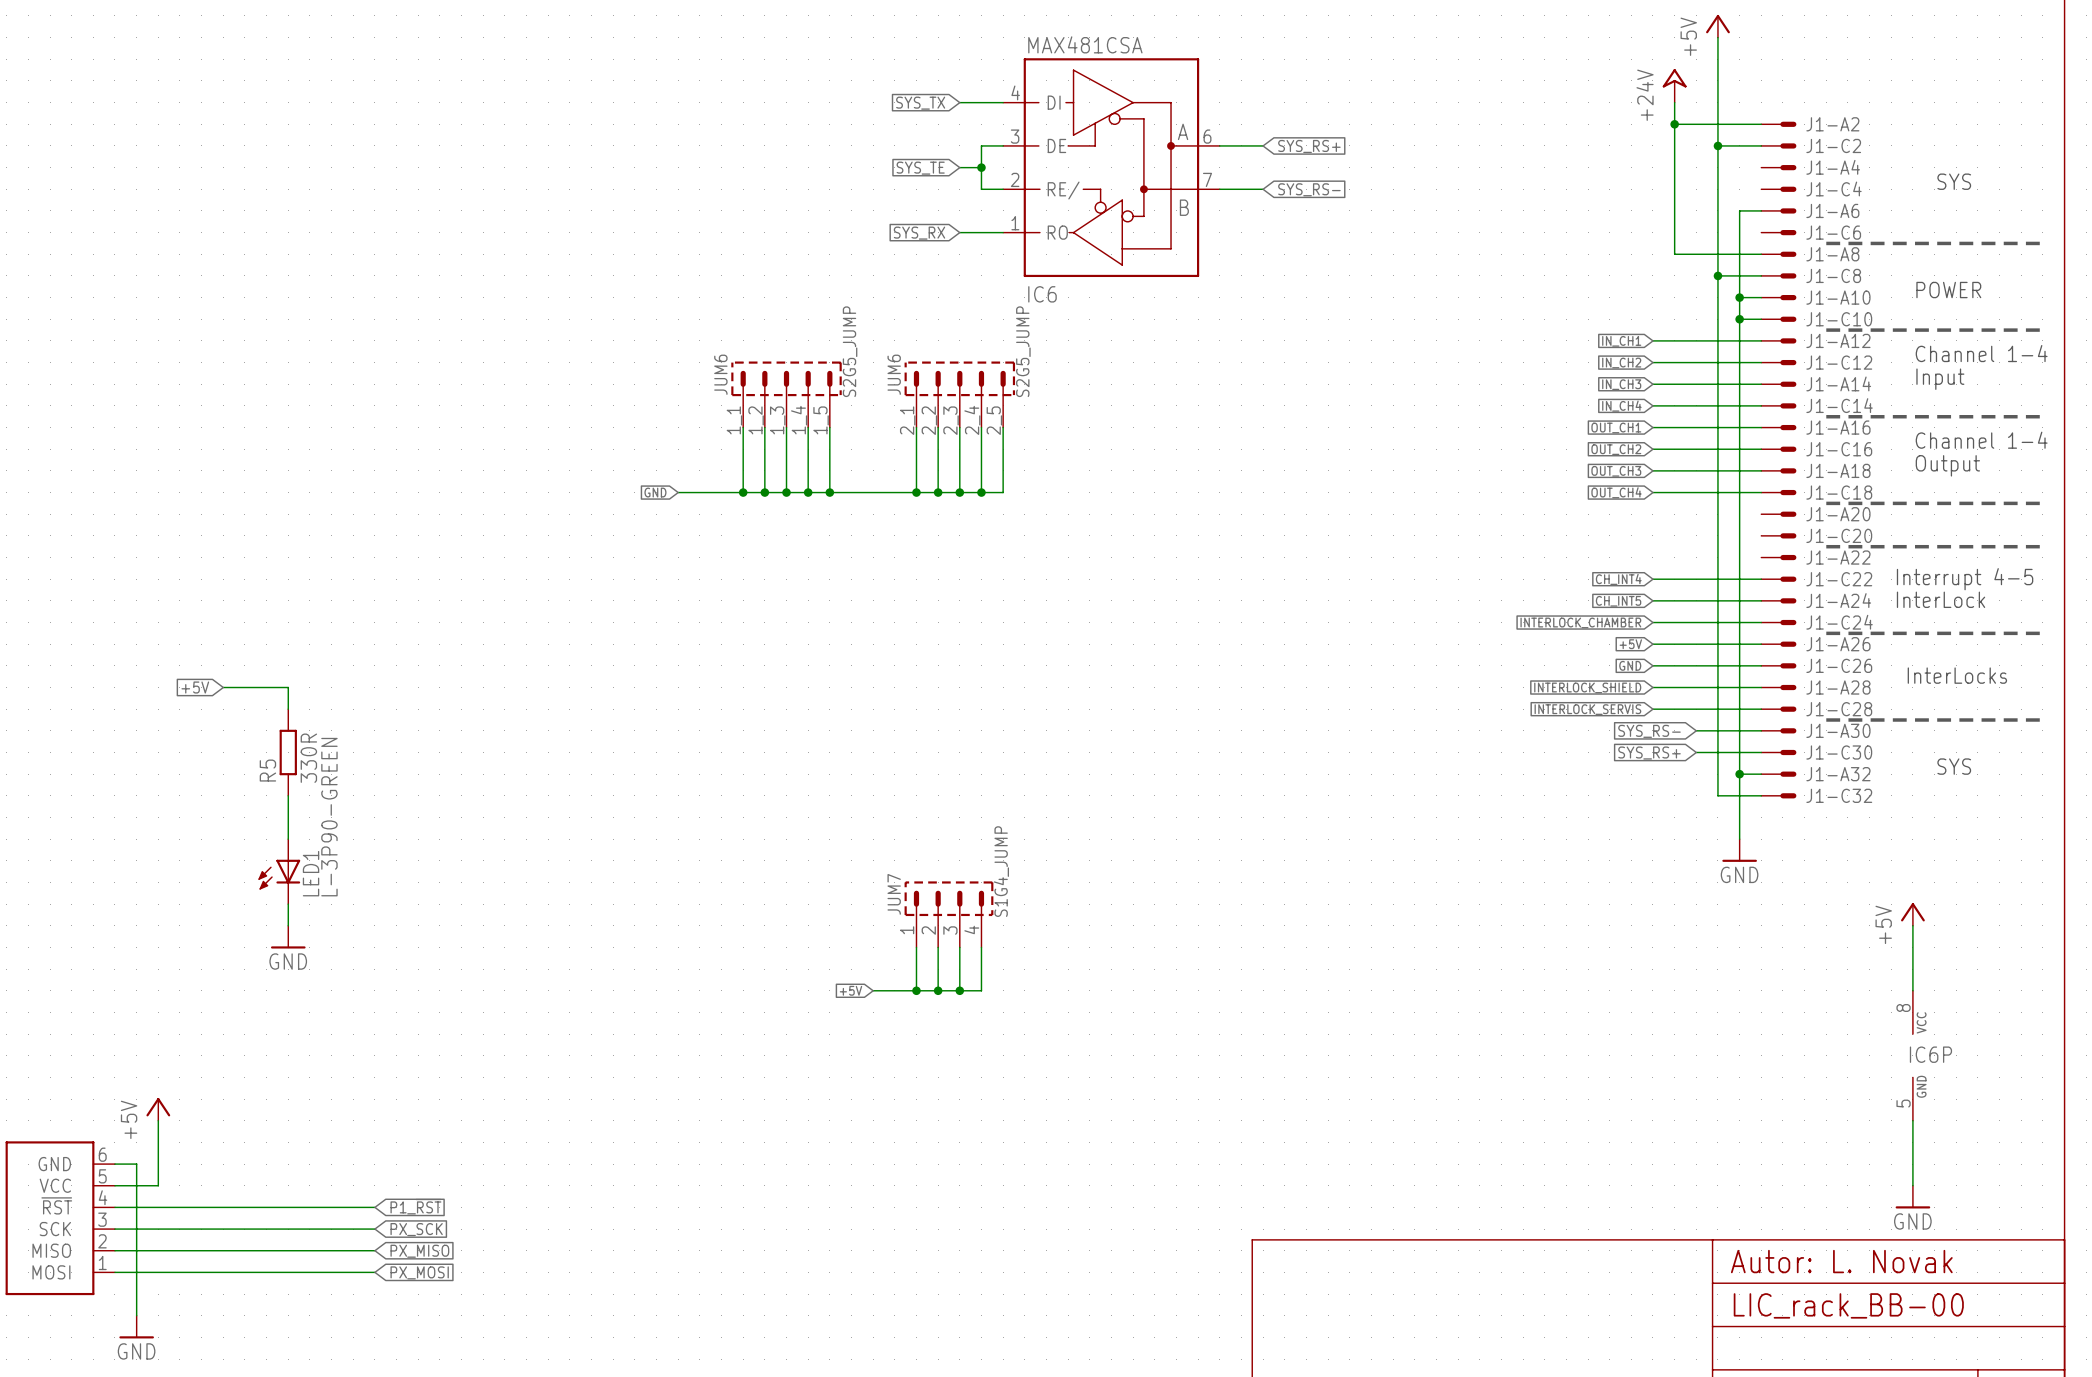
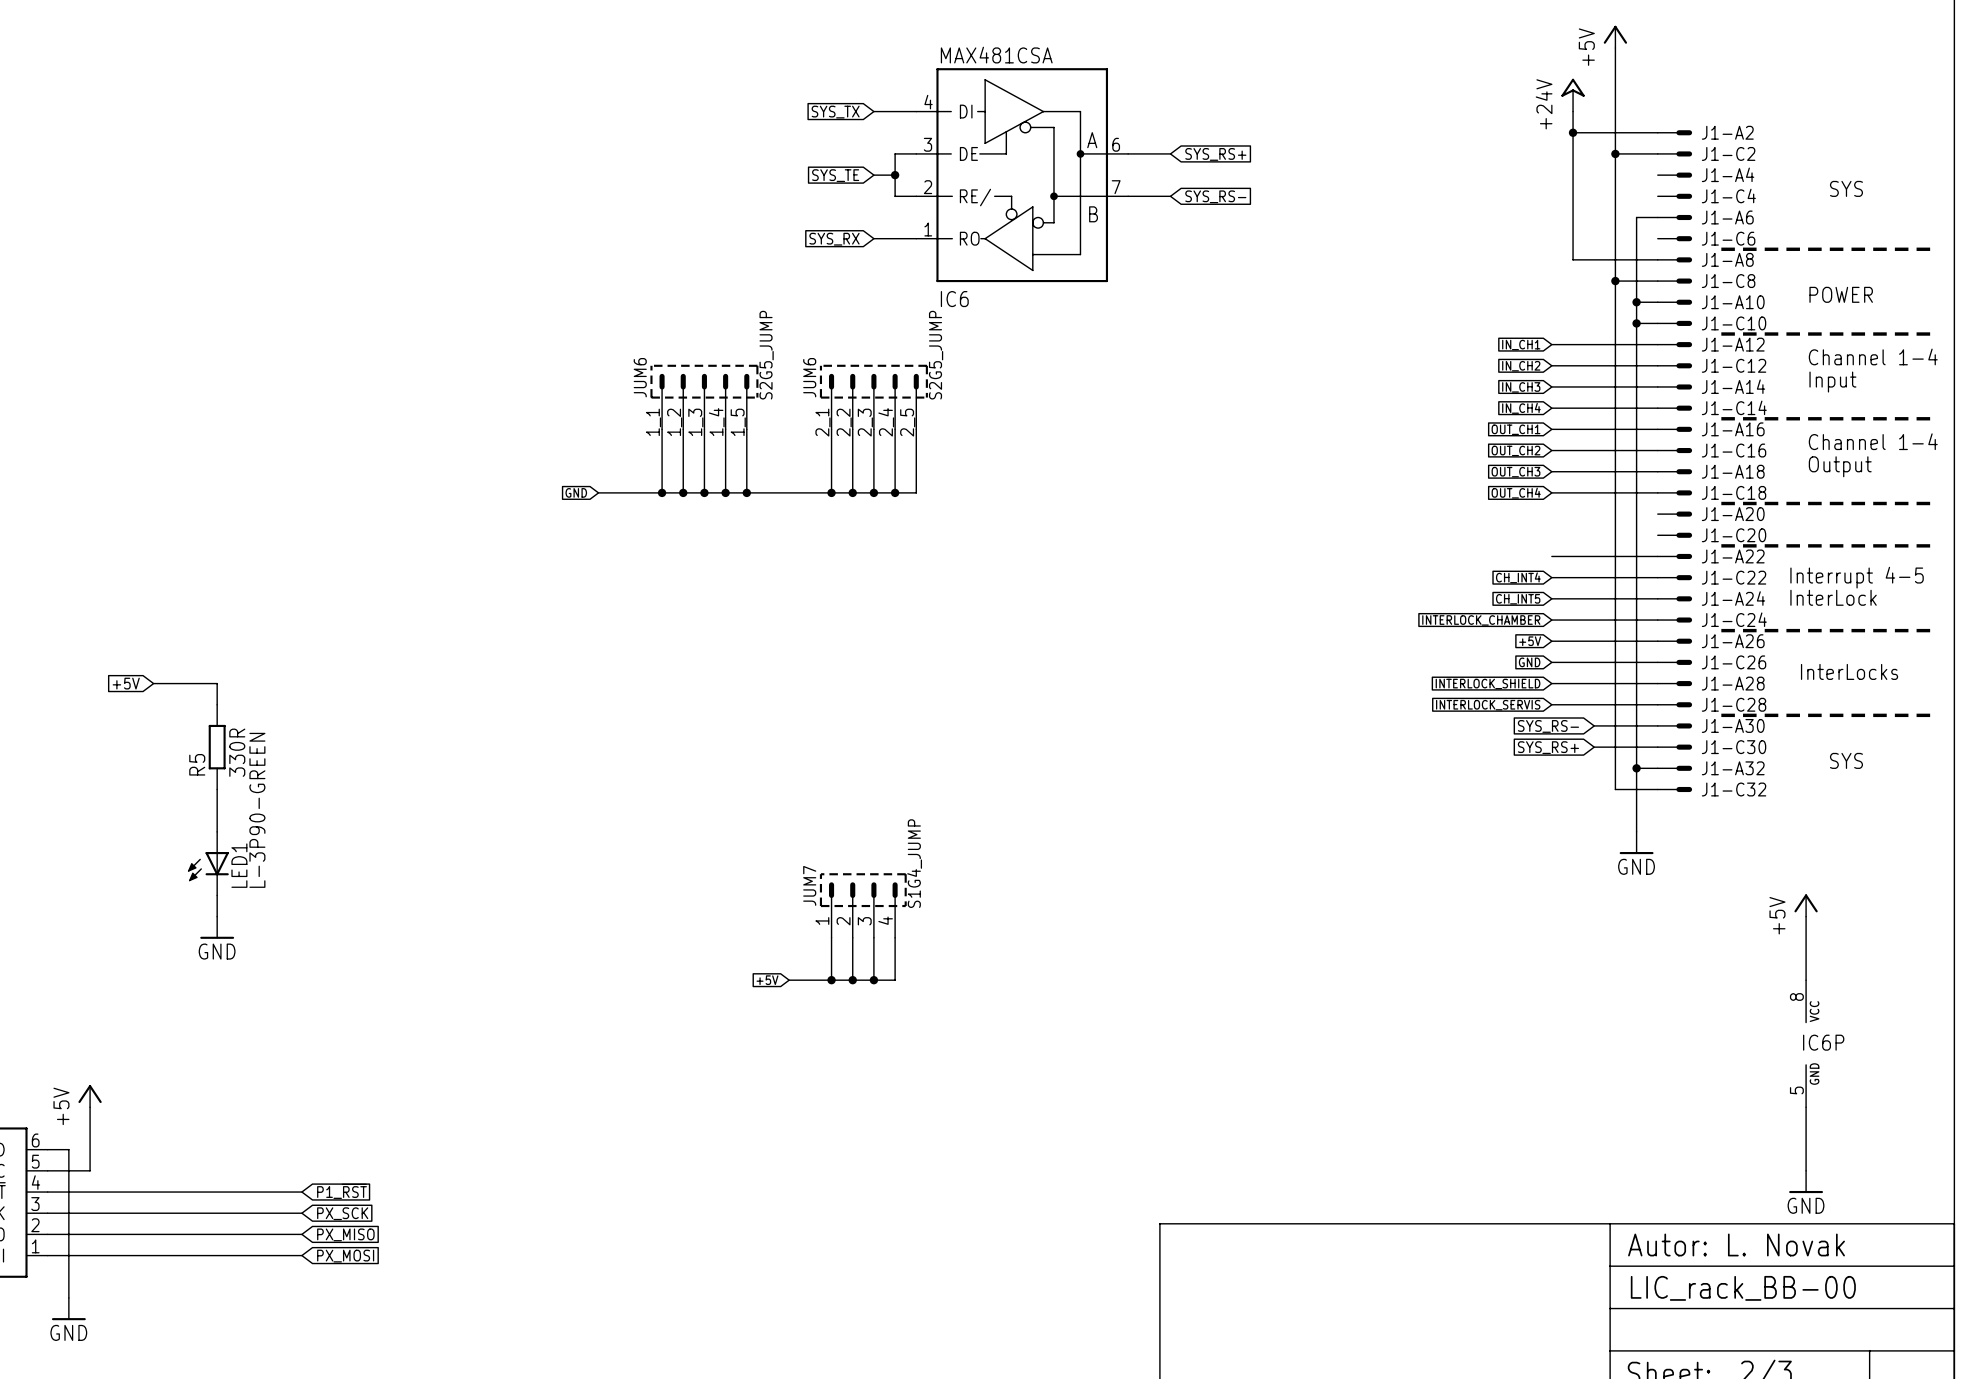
wire: none -> (1551, 556) (1657, 556)

